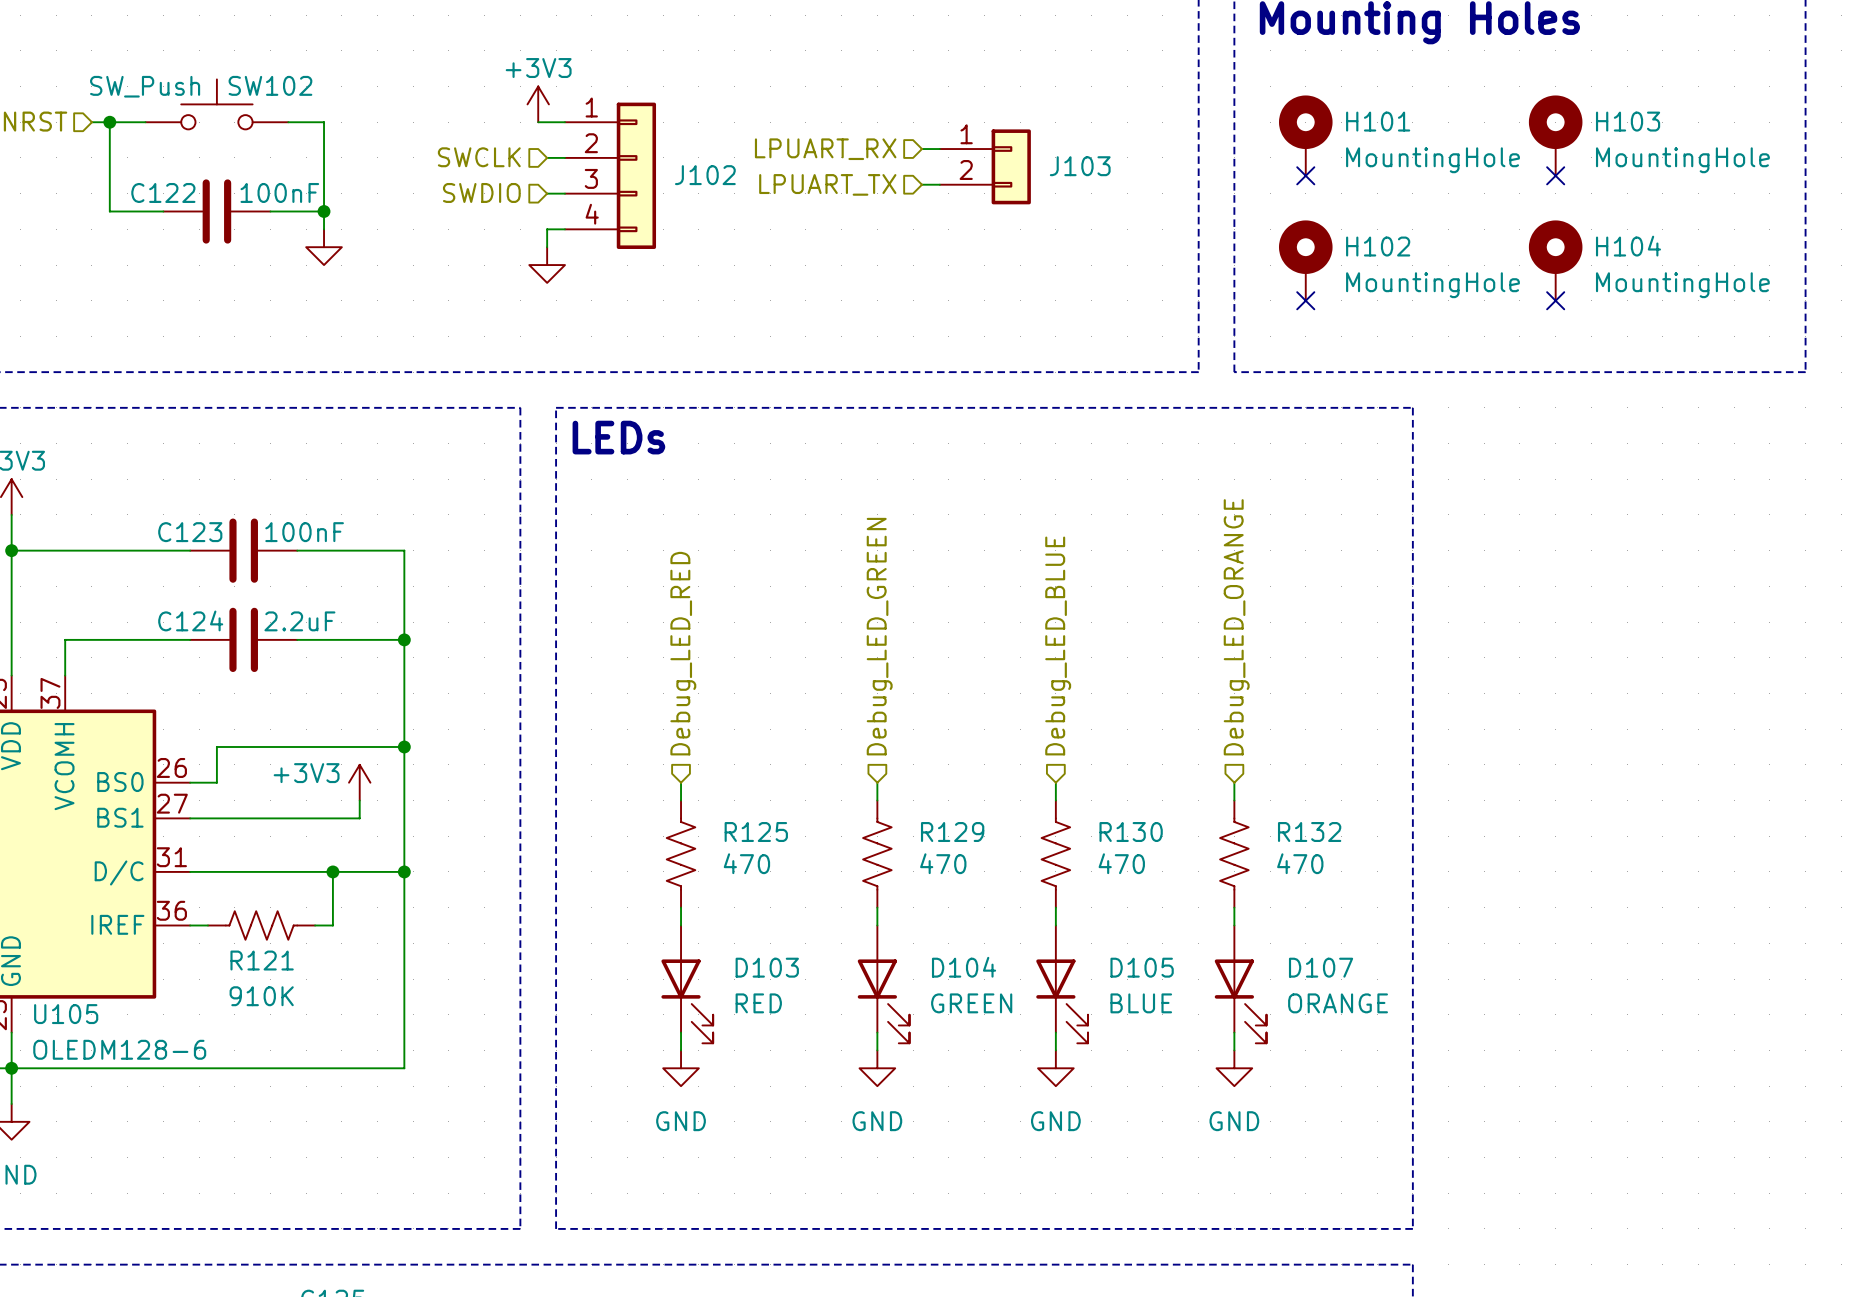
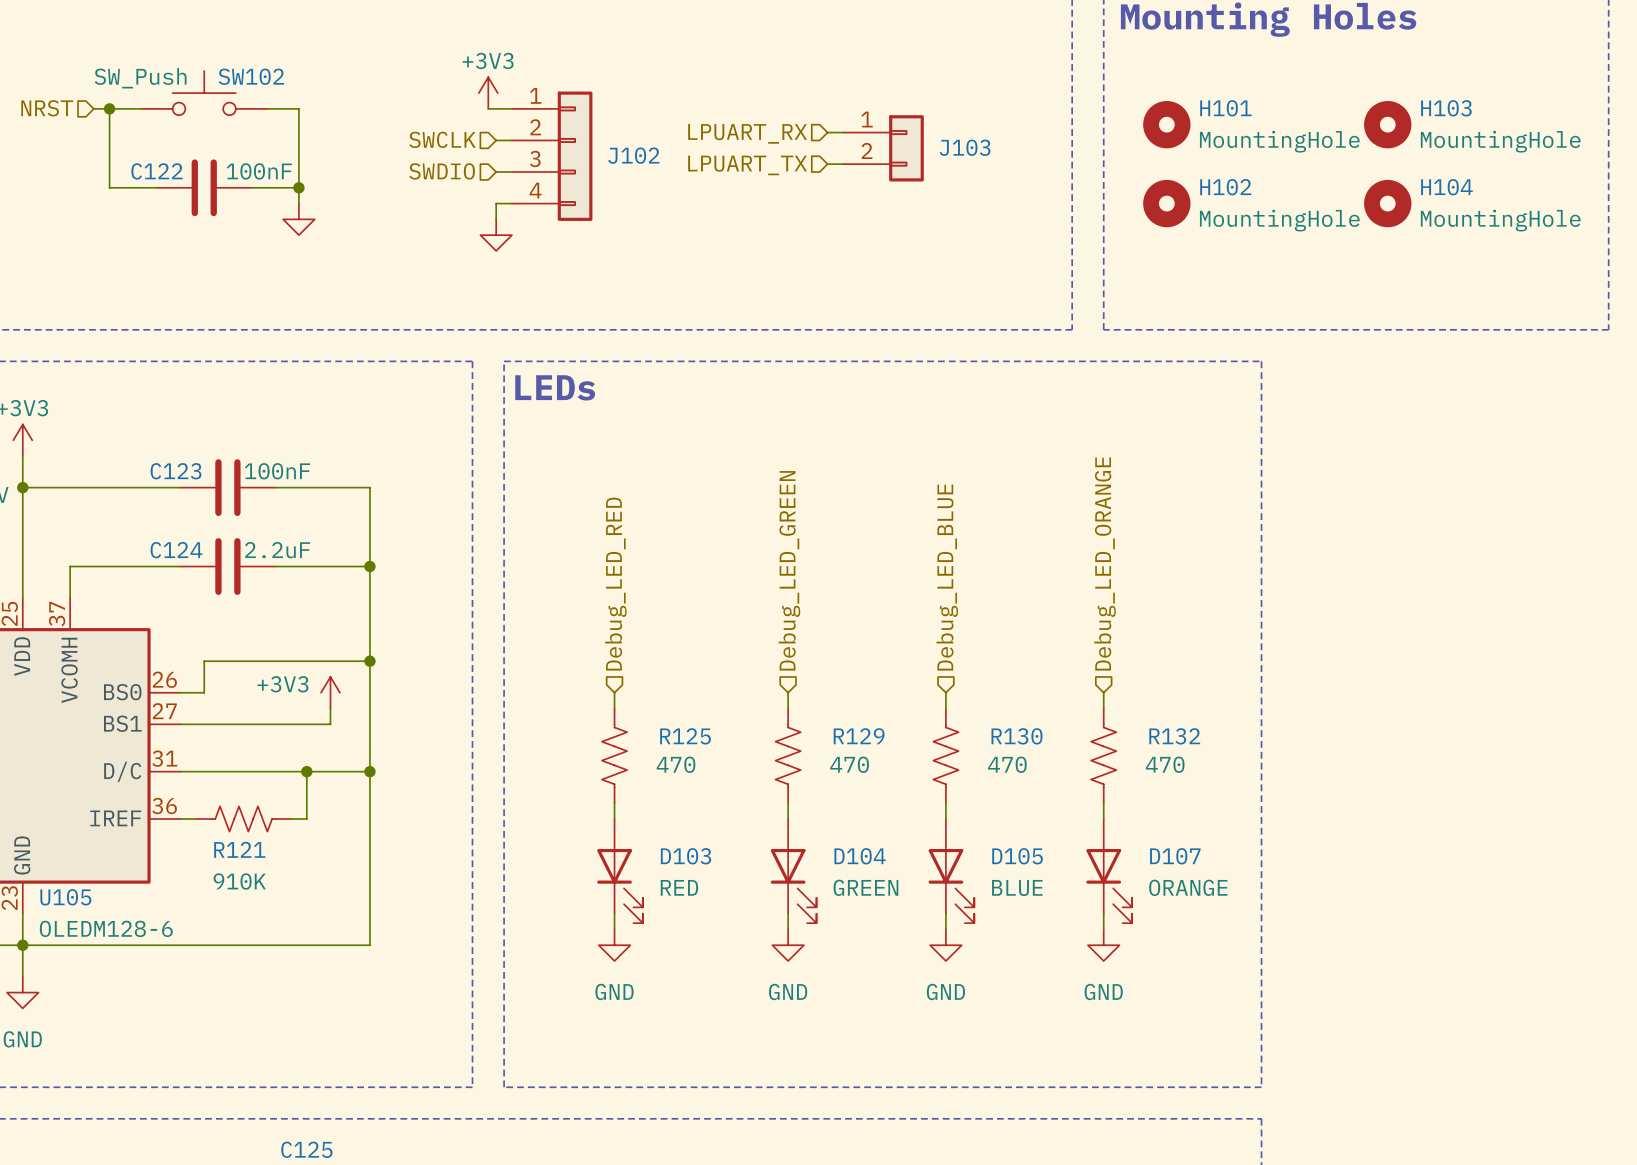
H101 symbol: [1278, 95, 1333, 176] -> [1143, 101, 1191, 149]
H103 symbol: [1528, 95, 1583, 176] -> [1364, 101, 1412, 149]
no-connect mark: (1305, 175) -> none
no-connect mark: (1555, 175) -> none
H102 symbol: [1278, 220, 1333, 301] -> [1143, 179, 1191, 228]
H104 symbol: [1528, 220, 1583, 301] -> [1364, 179, 1412, 228]
no-connect mark: (1305, 300) -> none
no-connect mark: (1555, 300) -> none

